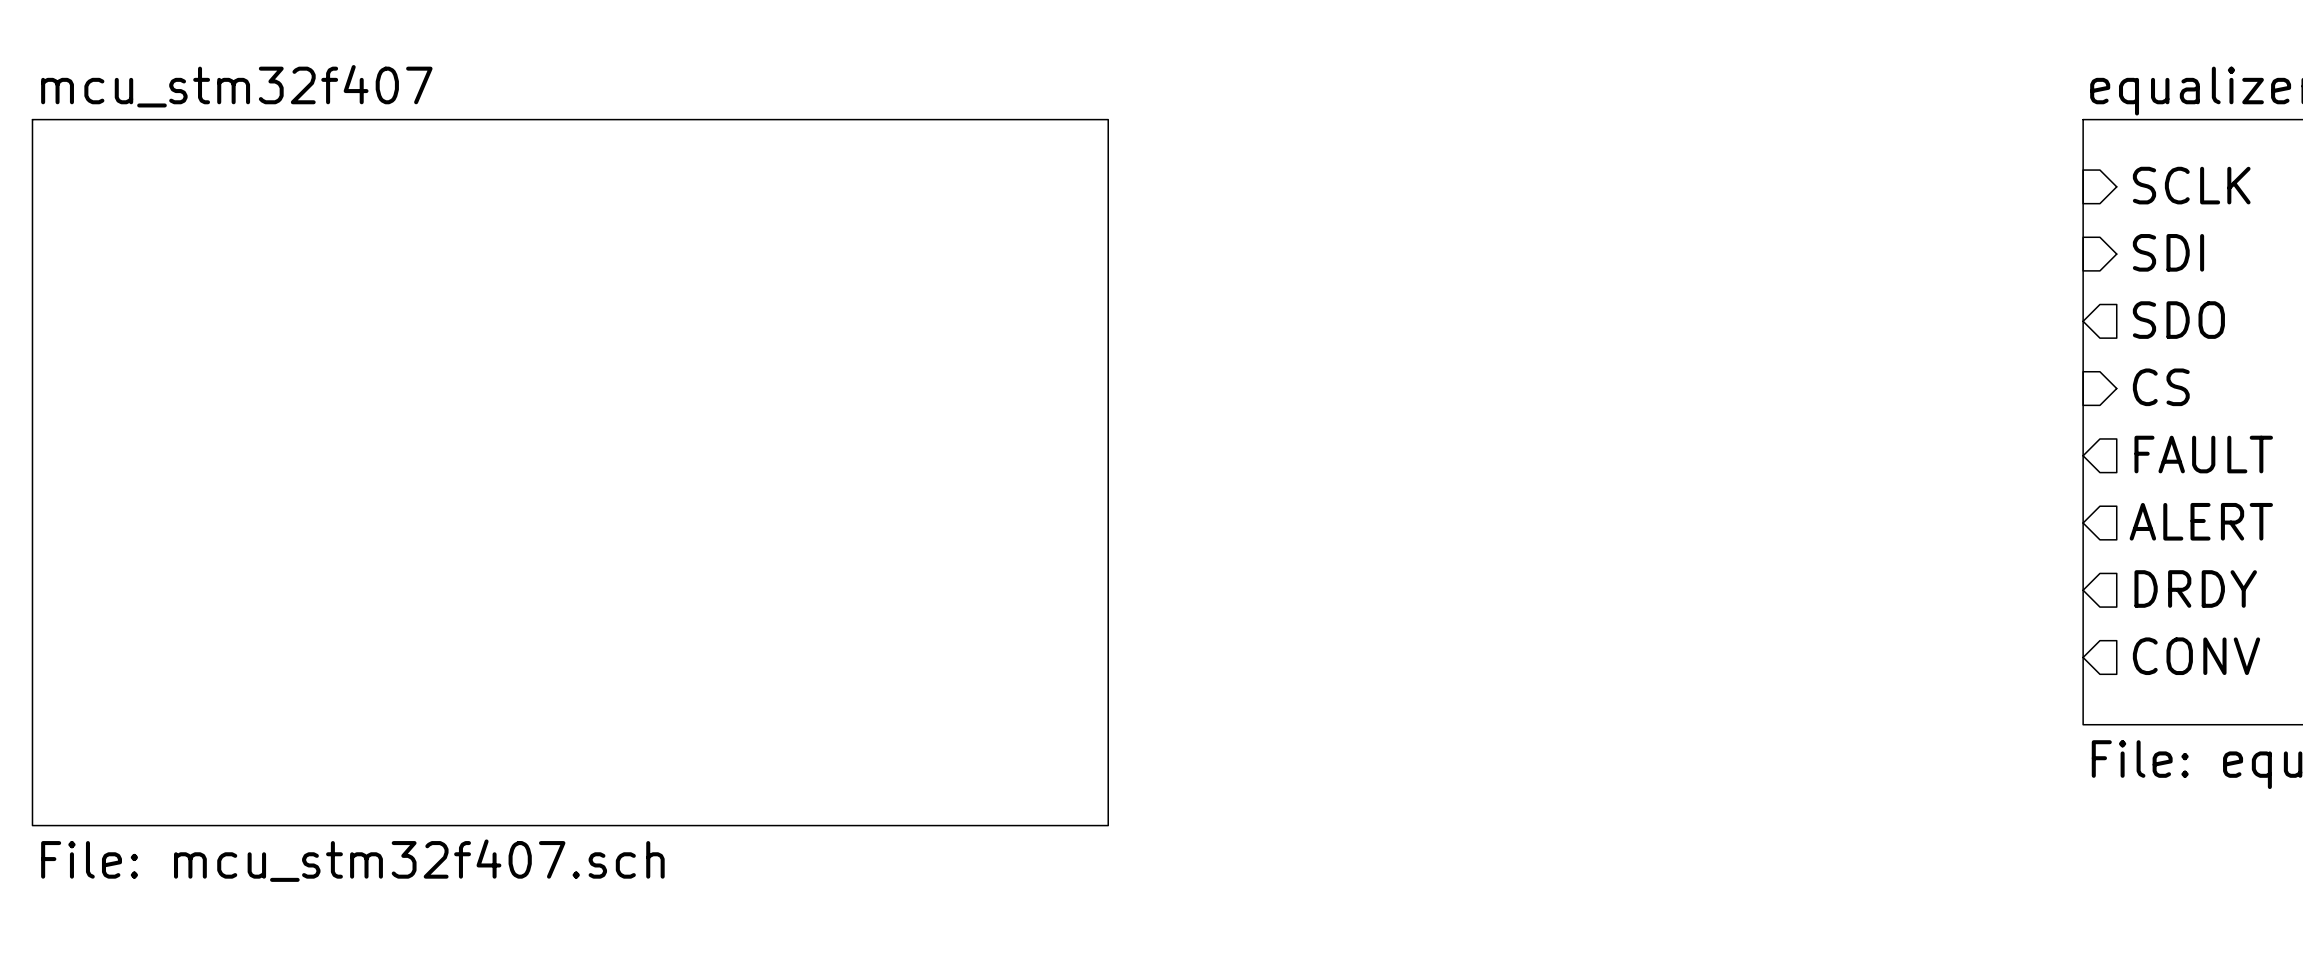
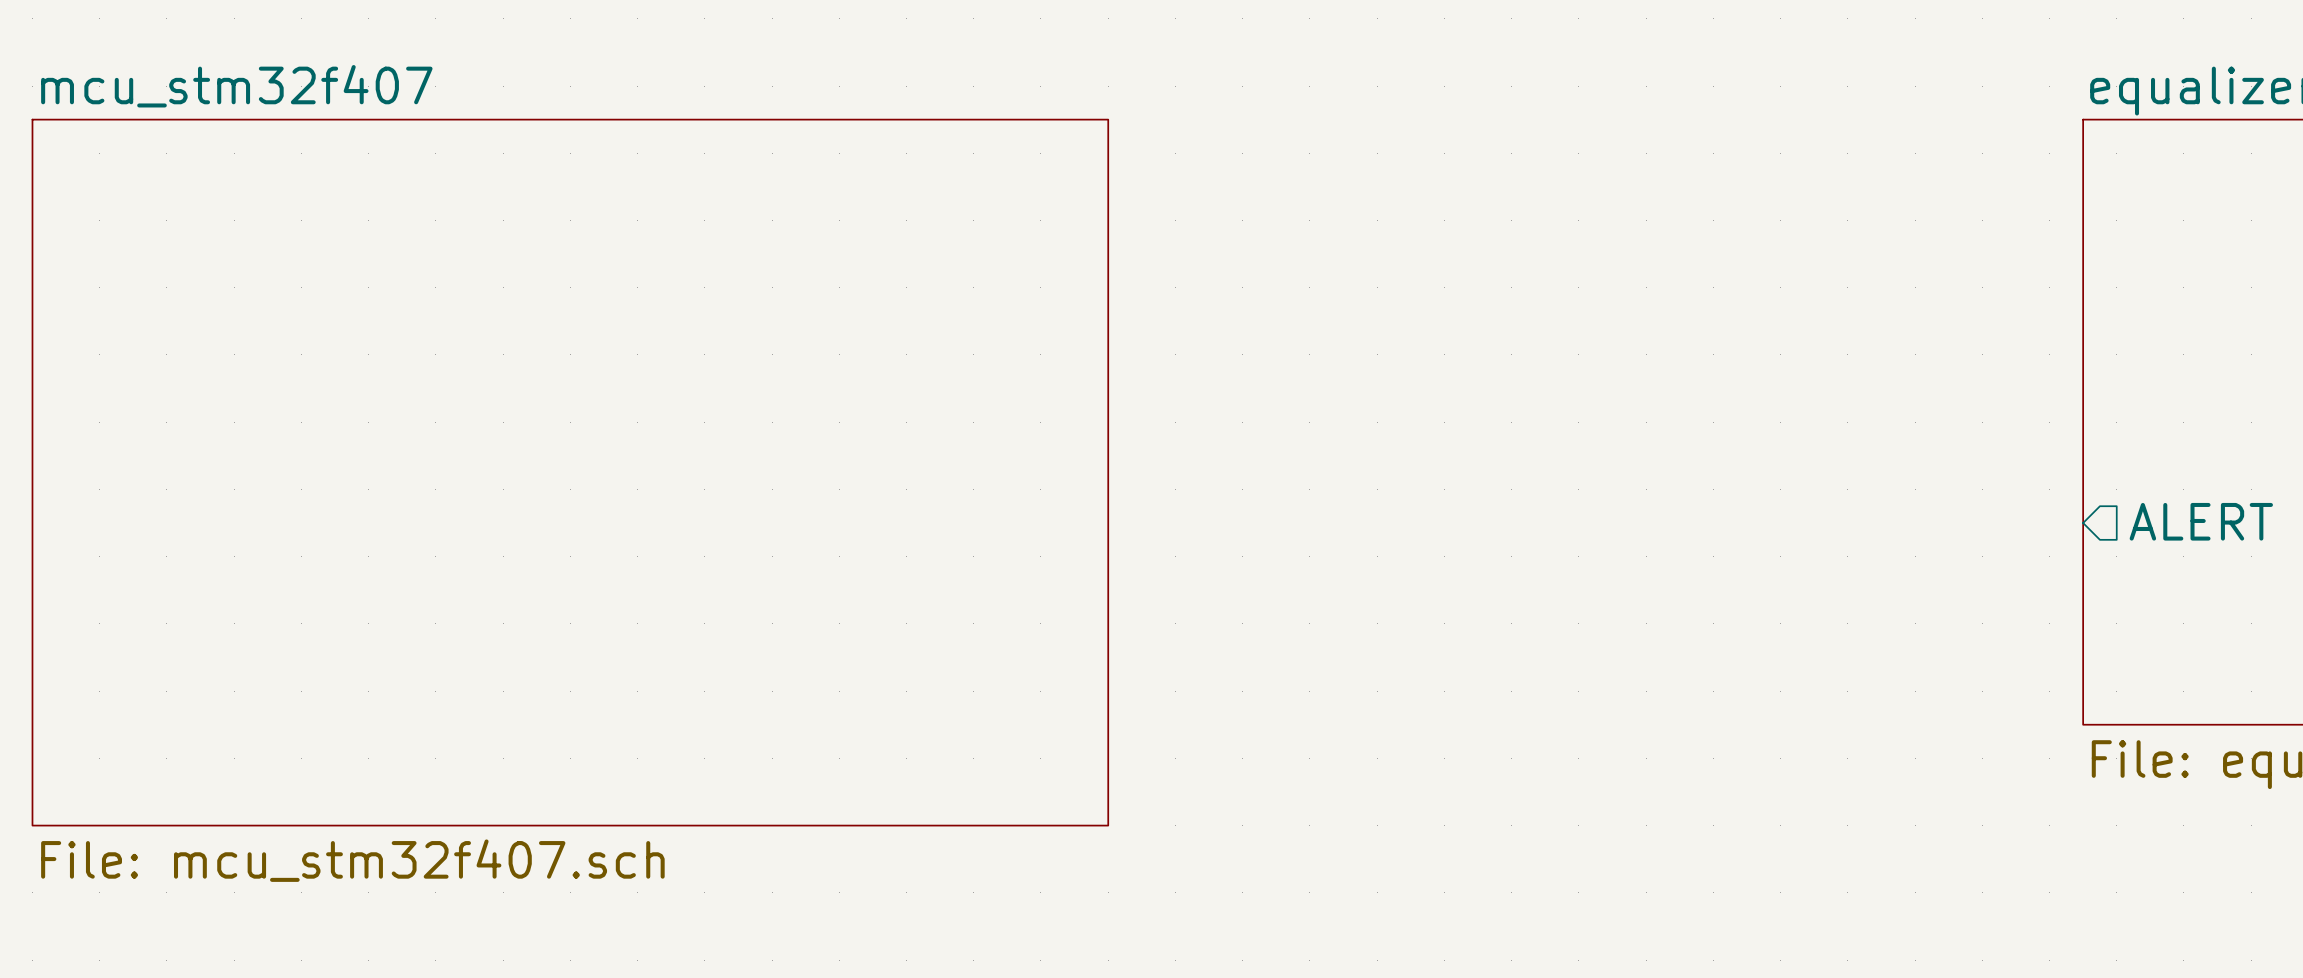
sheet pin: SCLK (2191, 185) -> none
sheet pin: SDI (2168, 252) -> none
sheet pin: SDO (2178, 320) -> none
sheet pin: CS (2161, 387) -> none
sheet pin: FAULT (2203, 454) -> none
sheet pin: DRDY (2195, 589) -> none
sheet pin: CONV (2196, 656) -> none

